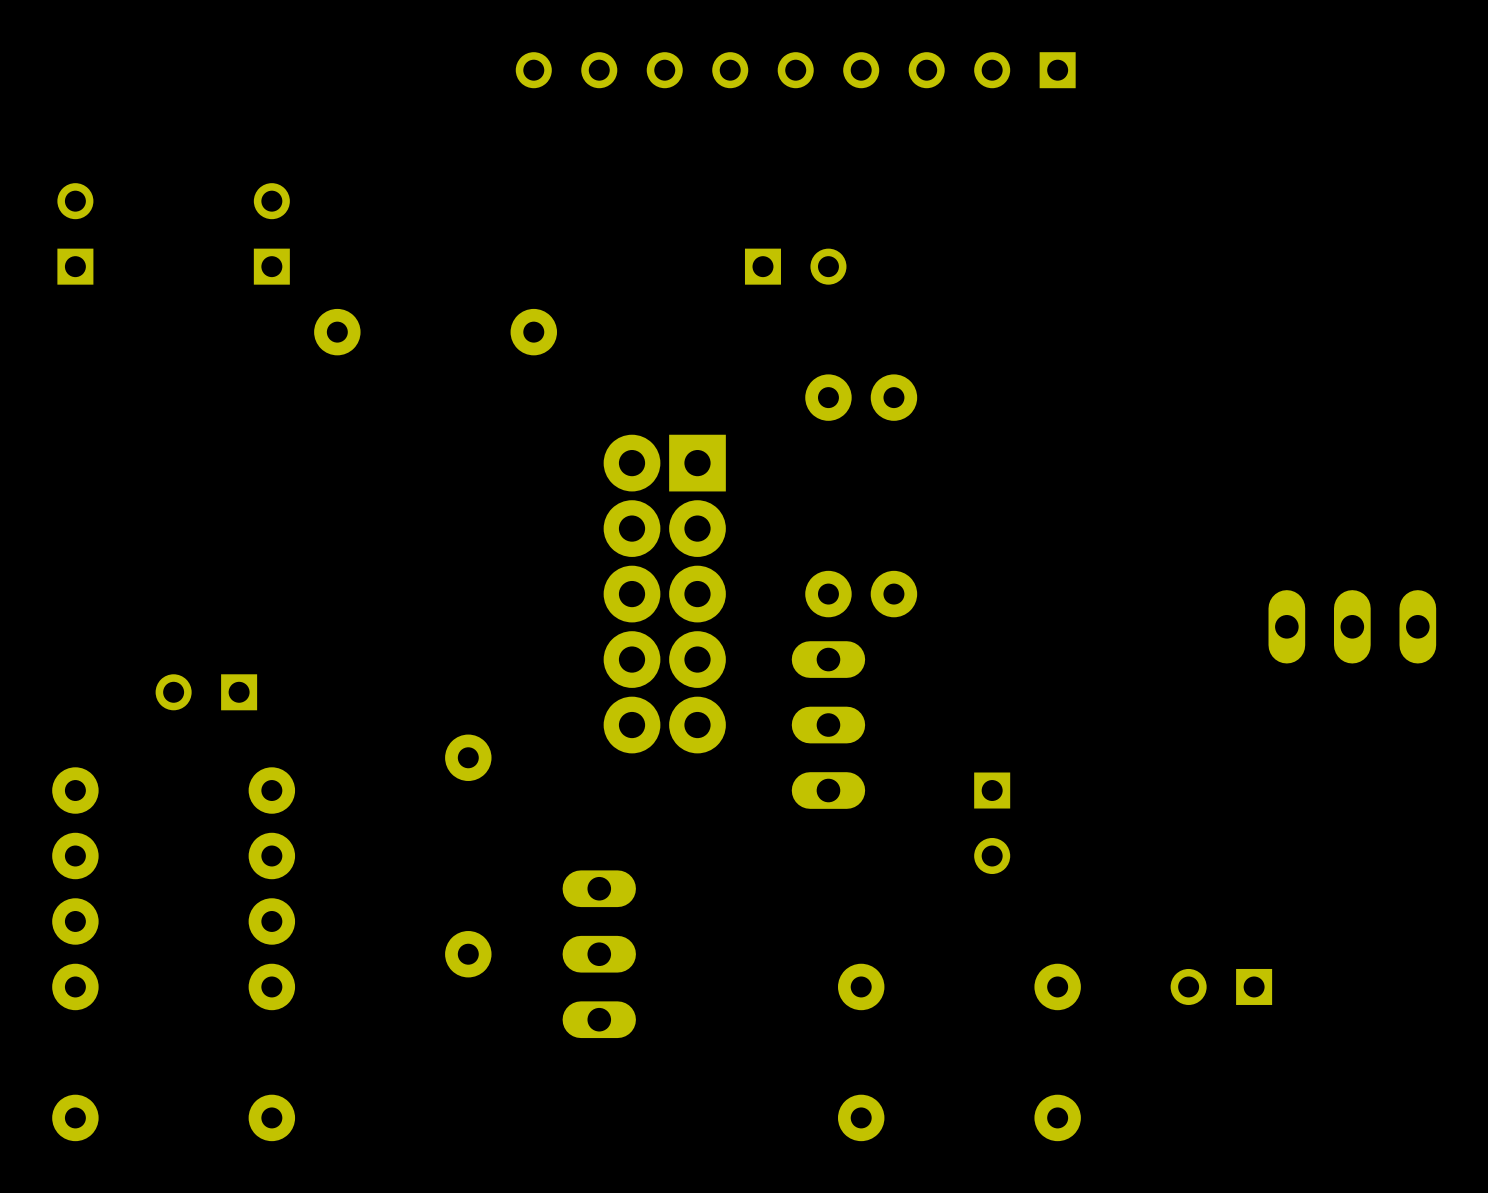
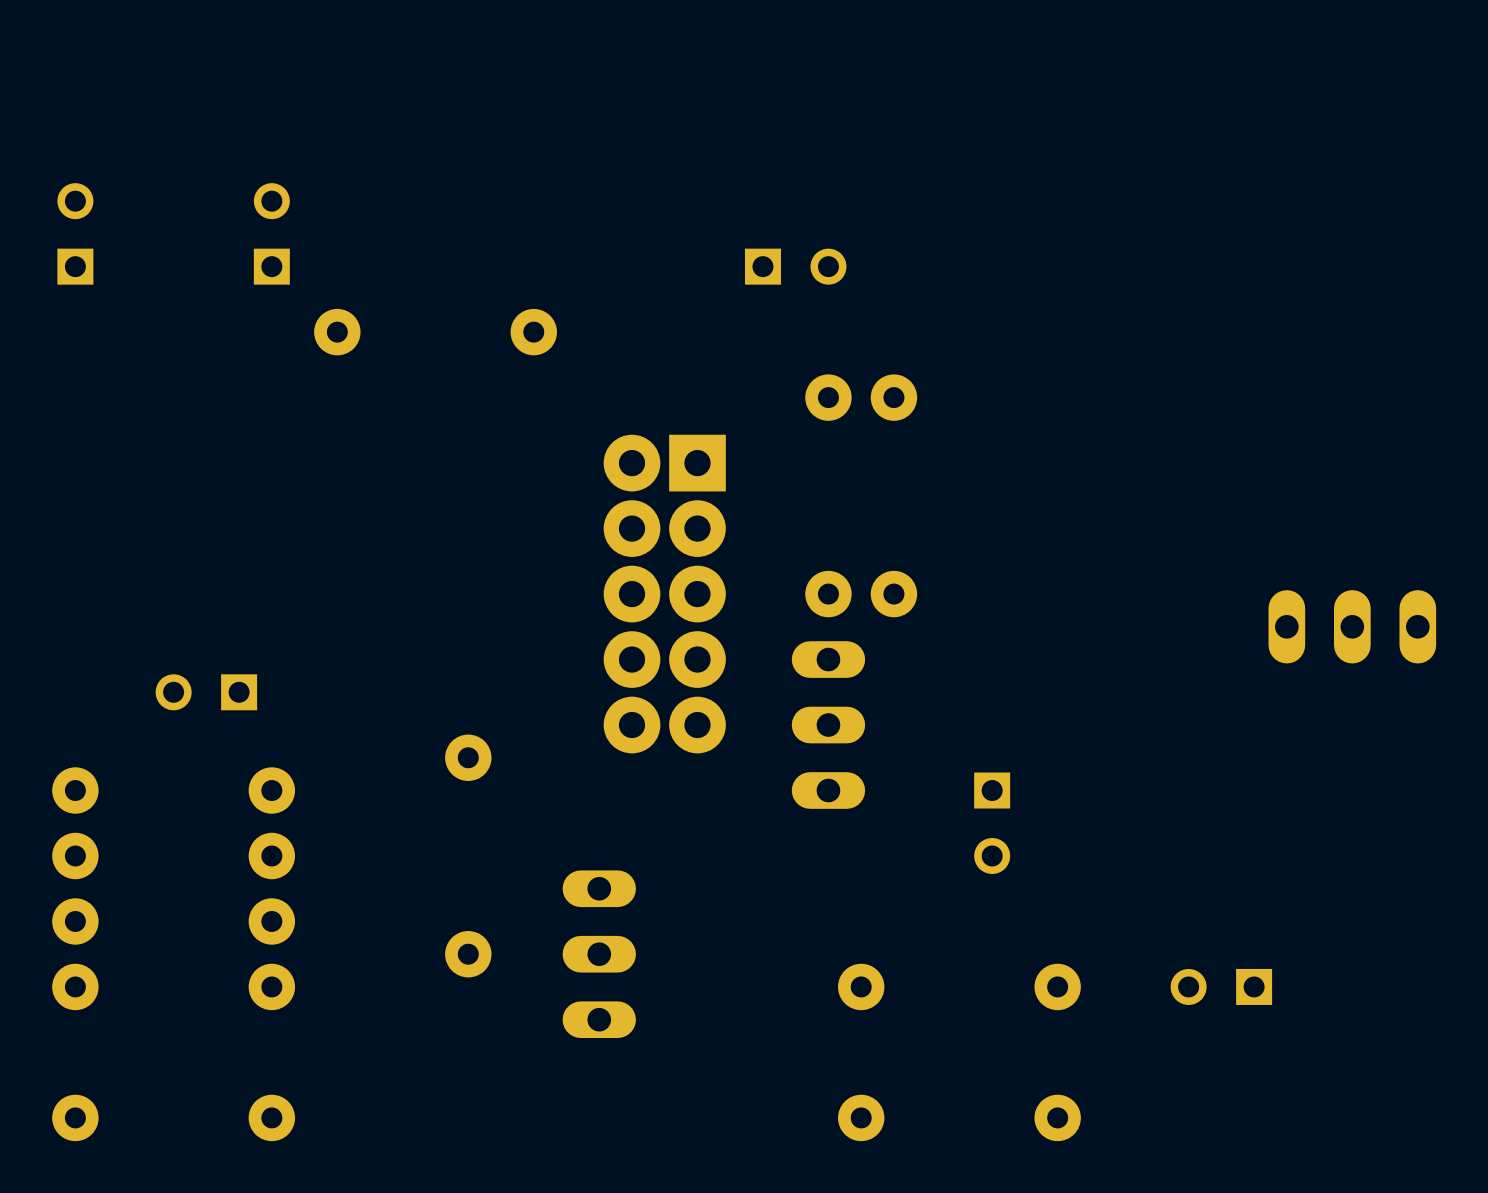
part: (795, 70) -> none

